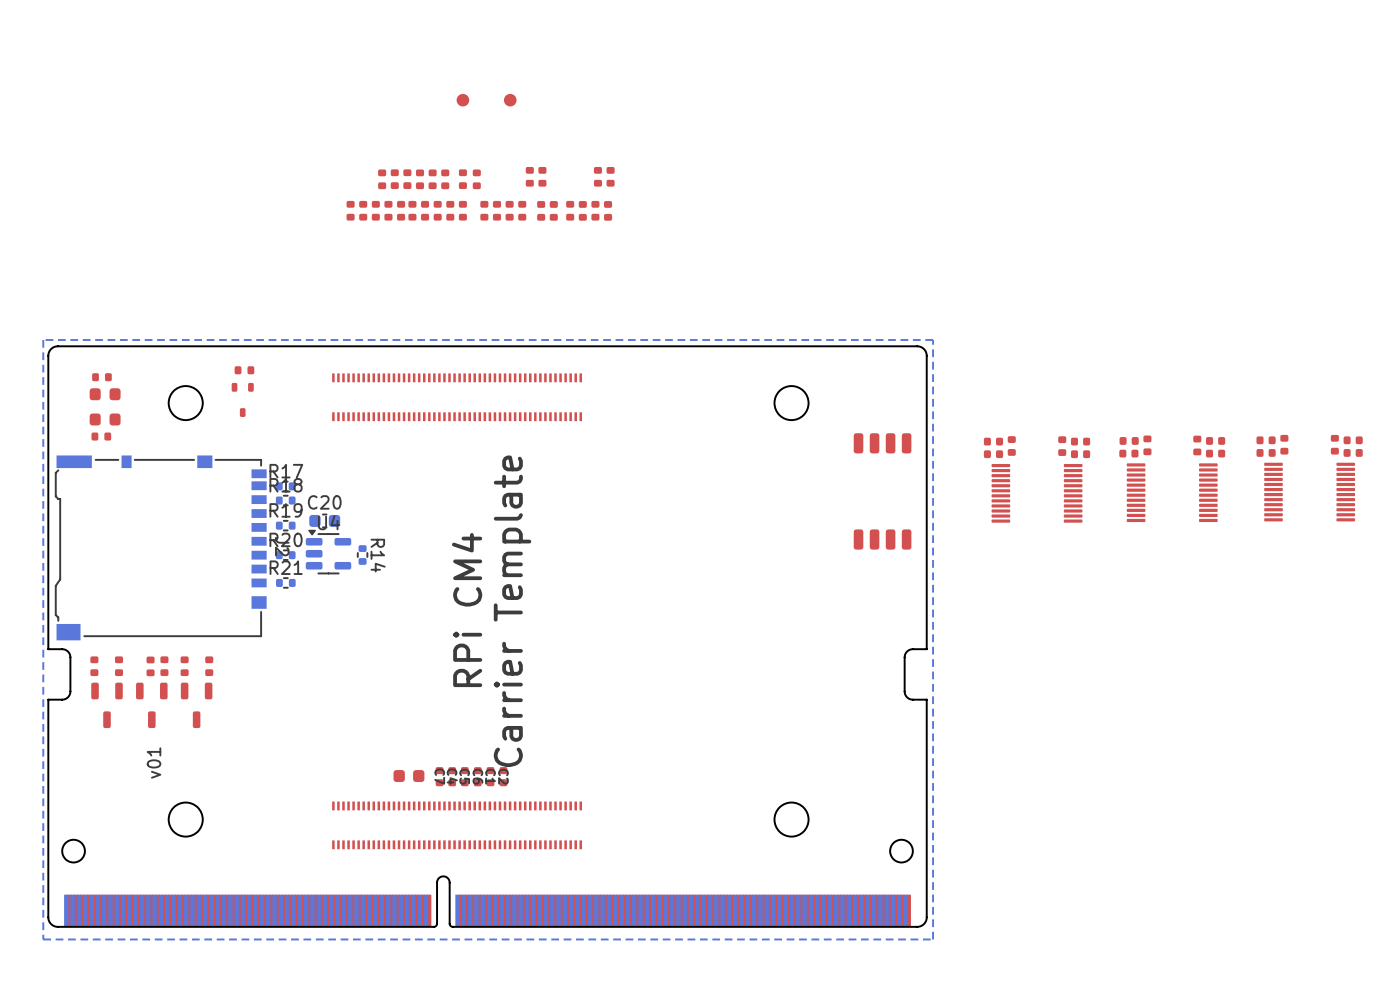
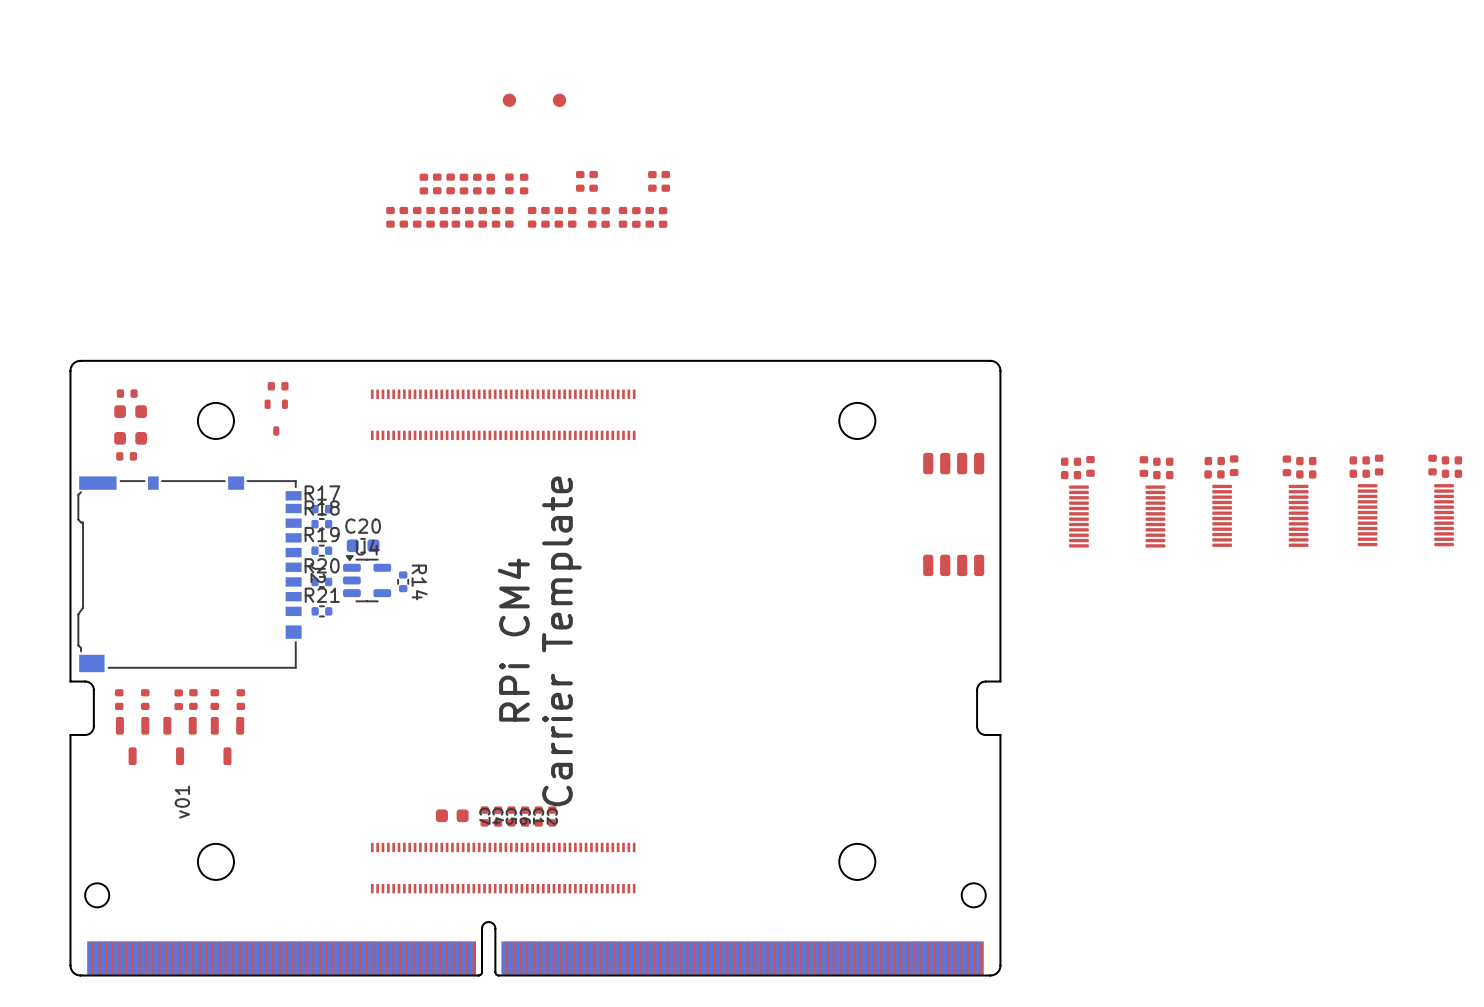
bottom zone outline: (933, 339) (43, 339) (43, 939) (933, 939) (933, 339) -> none

